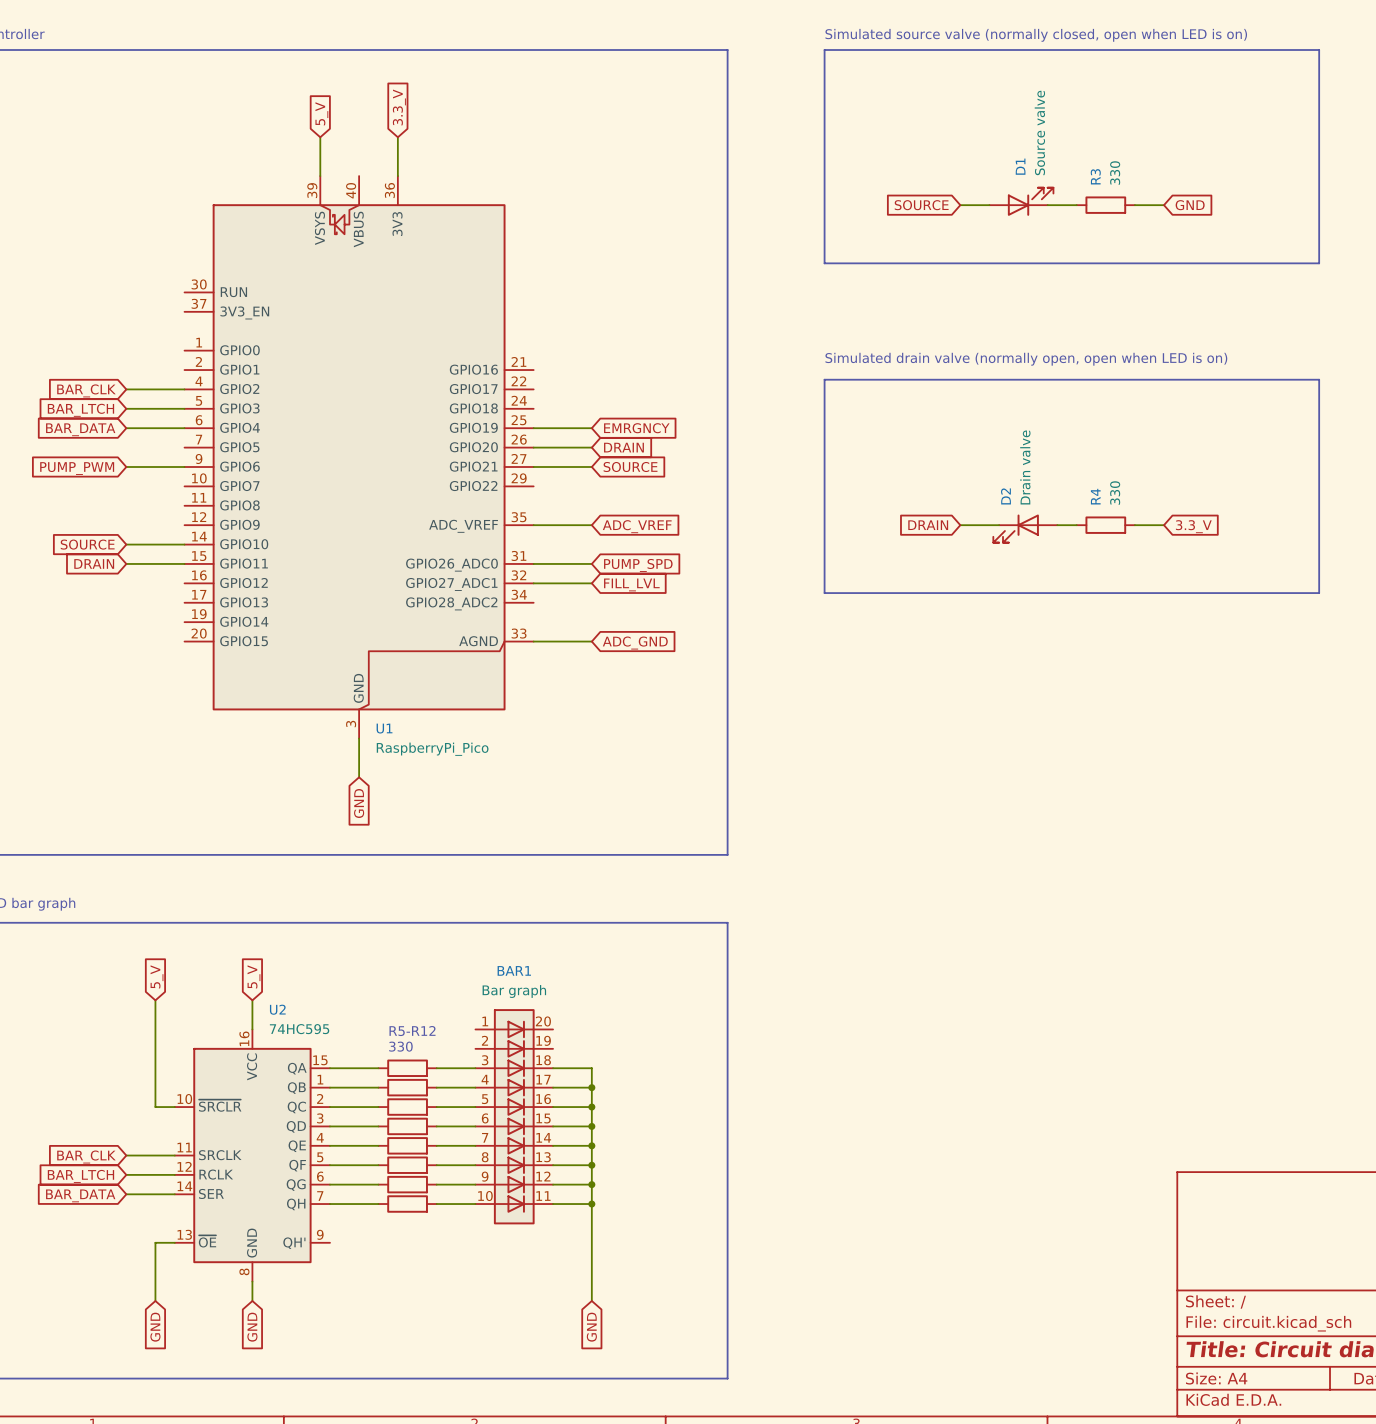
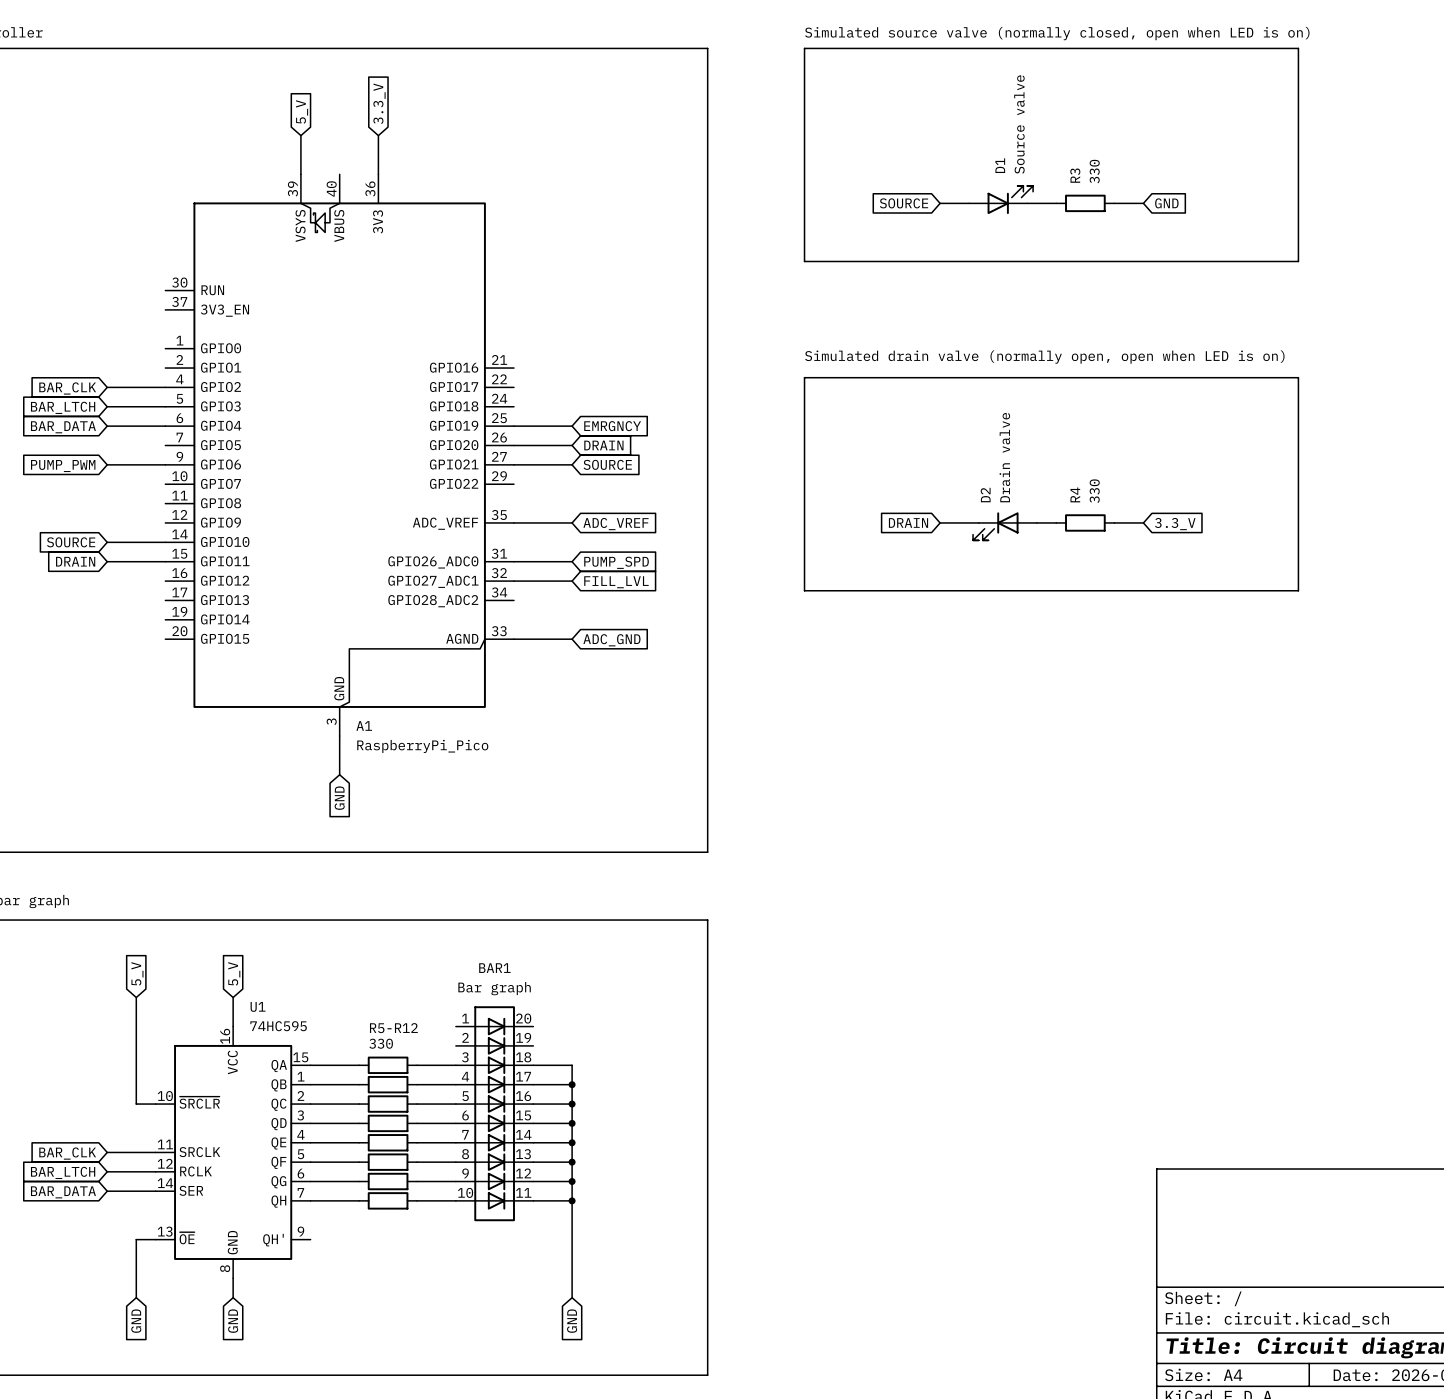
U1 name: U1 (384, 728) -> A1 (364, 725)
U2 name: U2 (277, 1009) -> U1 (258, 1006)

